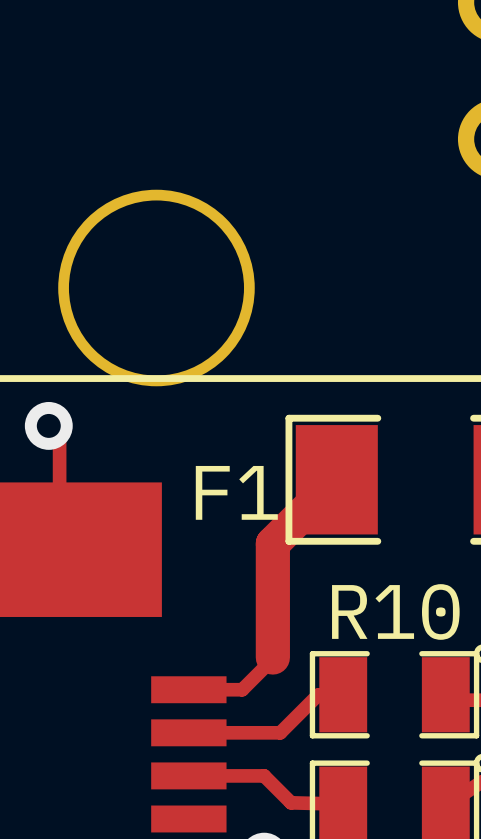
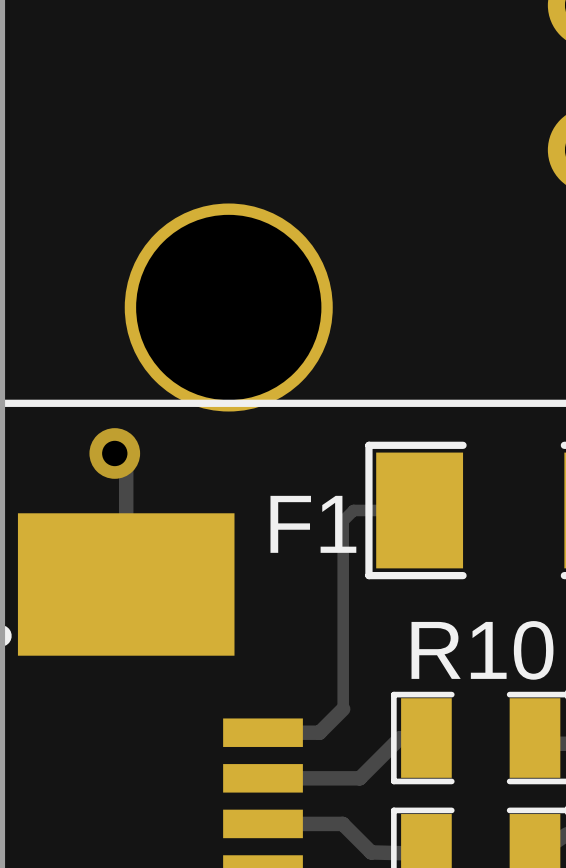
track: (336, 479) (272, 543) (272, 659) (264, 667) -> (419, 510) (353, 510) (343, 520) (343, 709)

